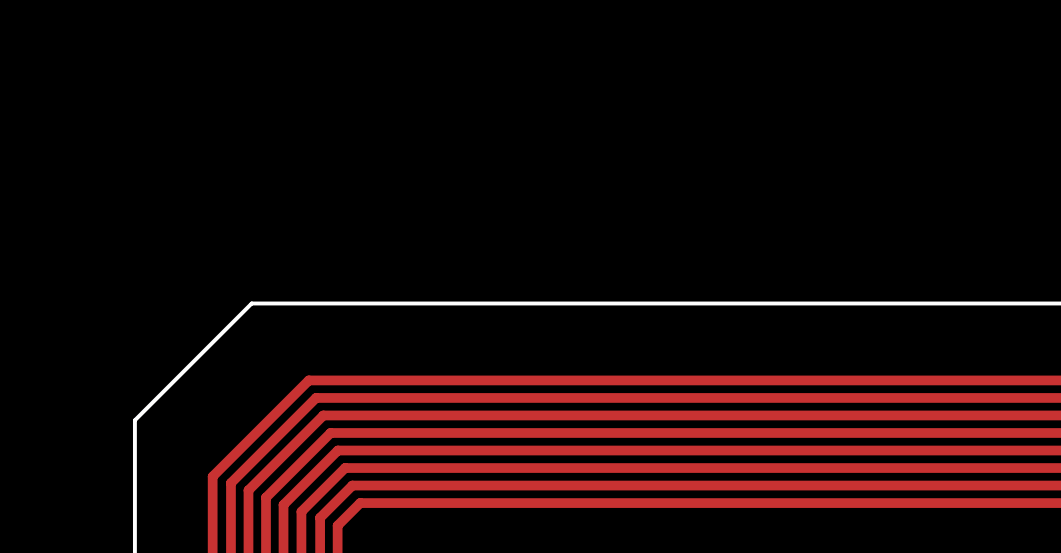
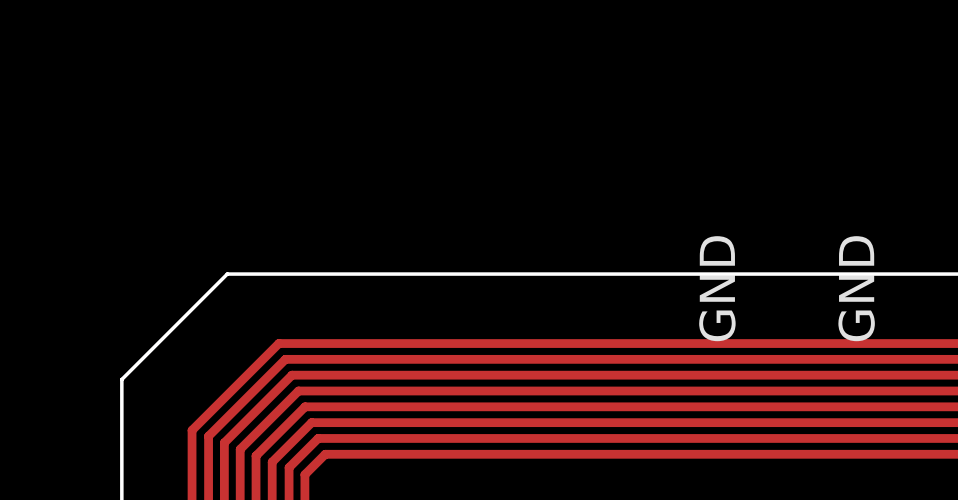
text: none -> GND (717, 288)
text: none -> GND (856, 288)

